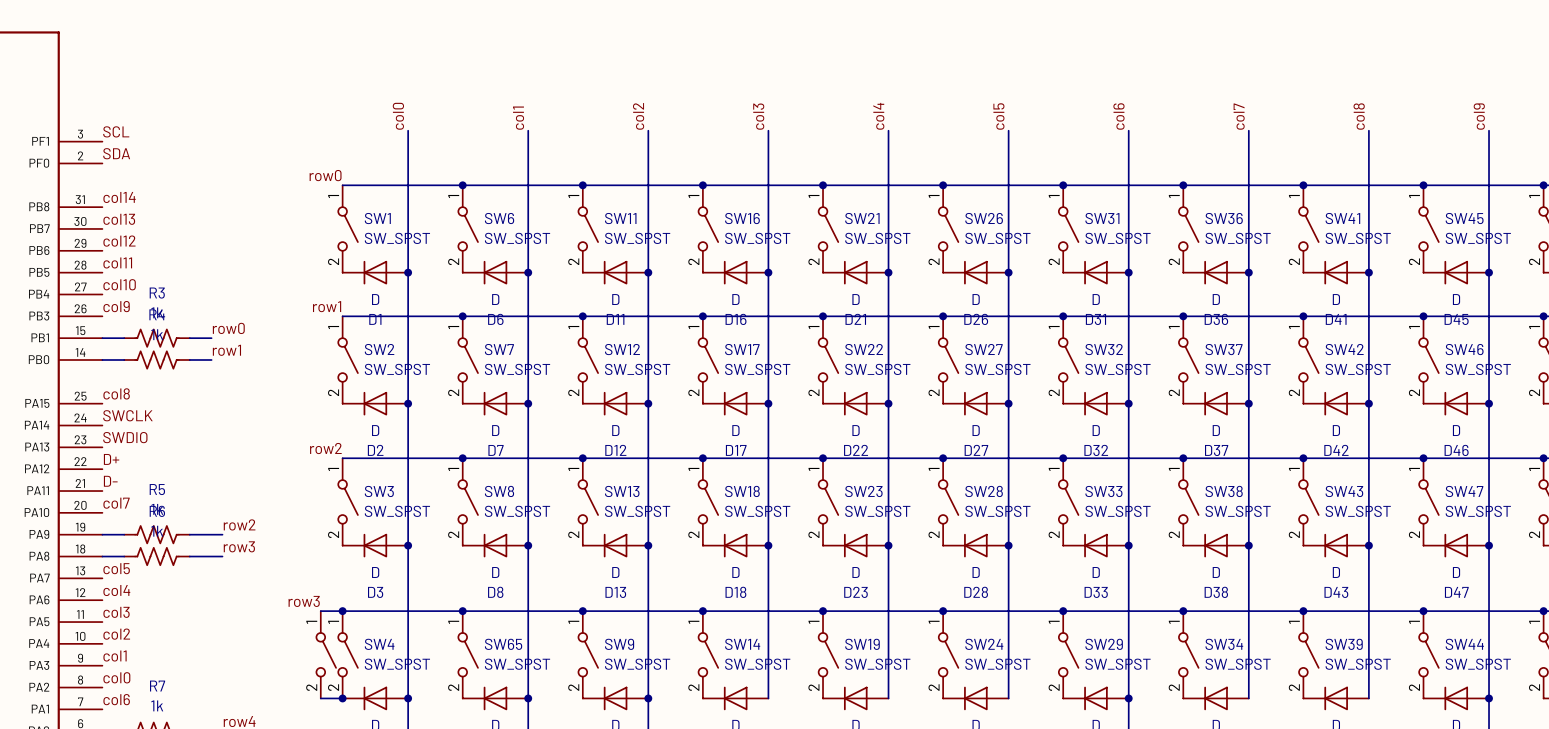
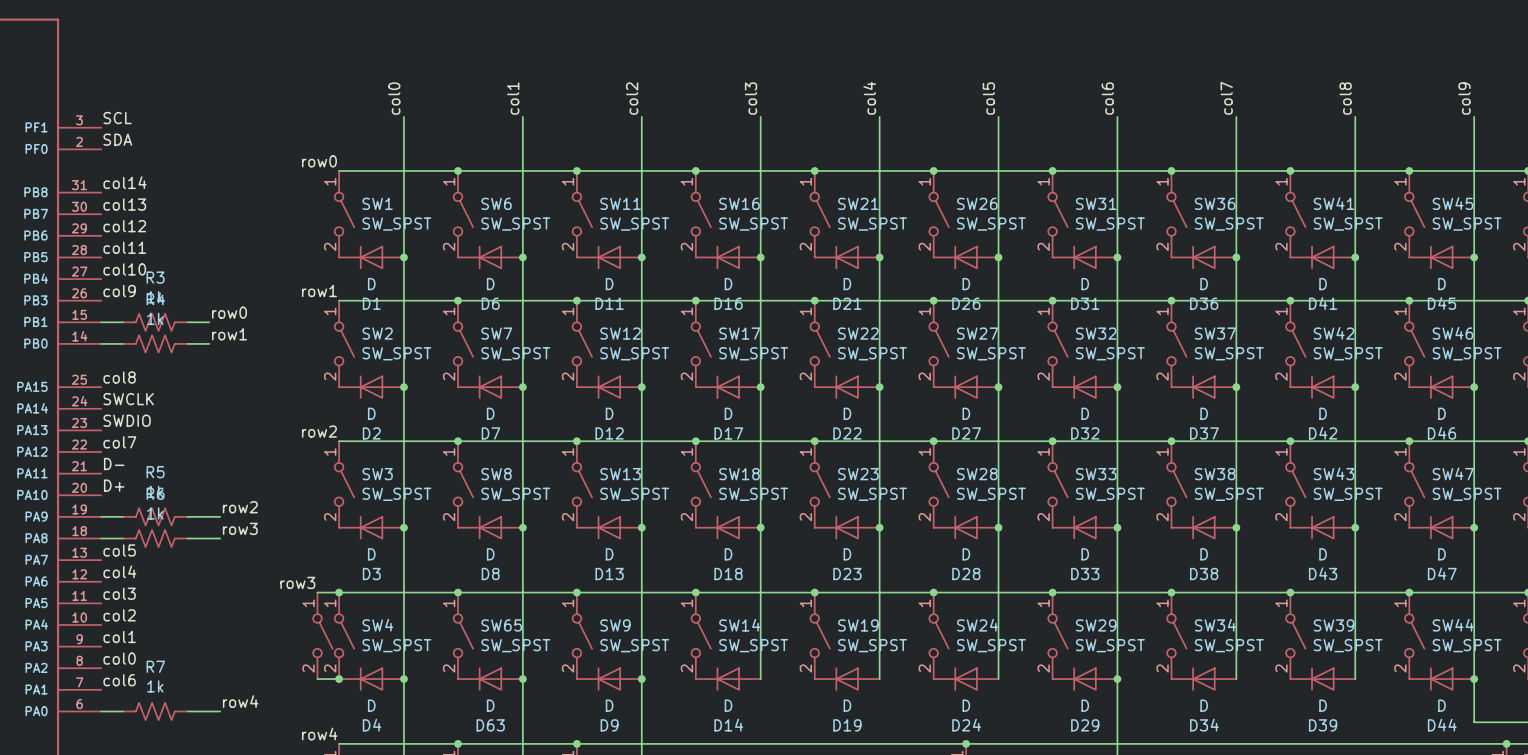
label: D+ (111, 459) -> col7 (119, 442)
label: col7 (116, 503) -> D+ (114, 485)

